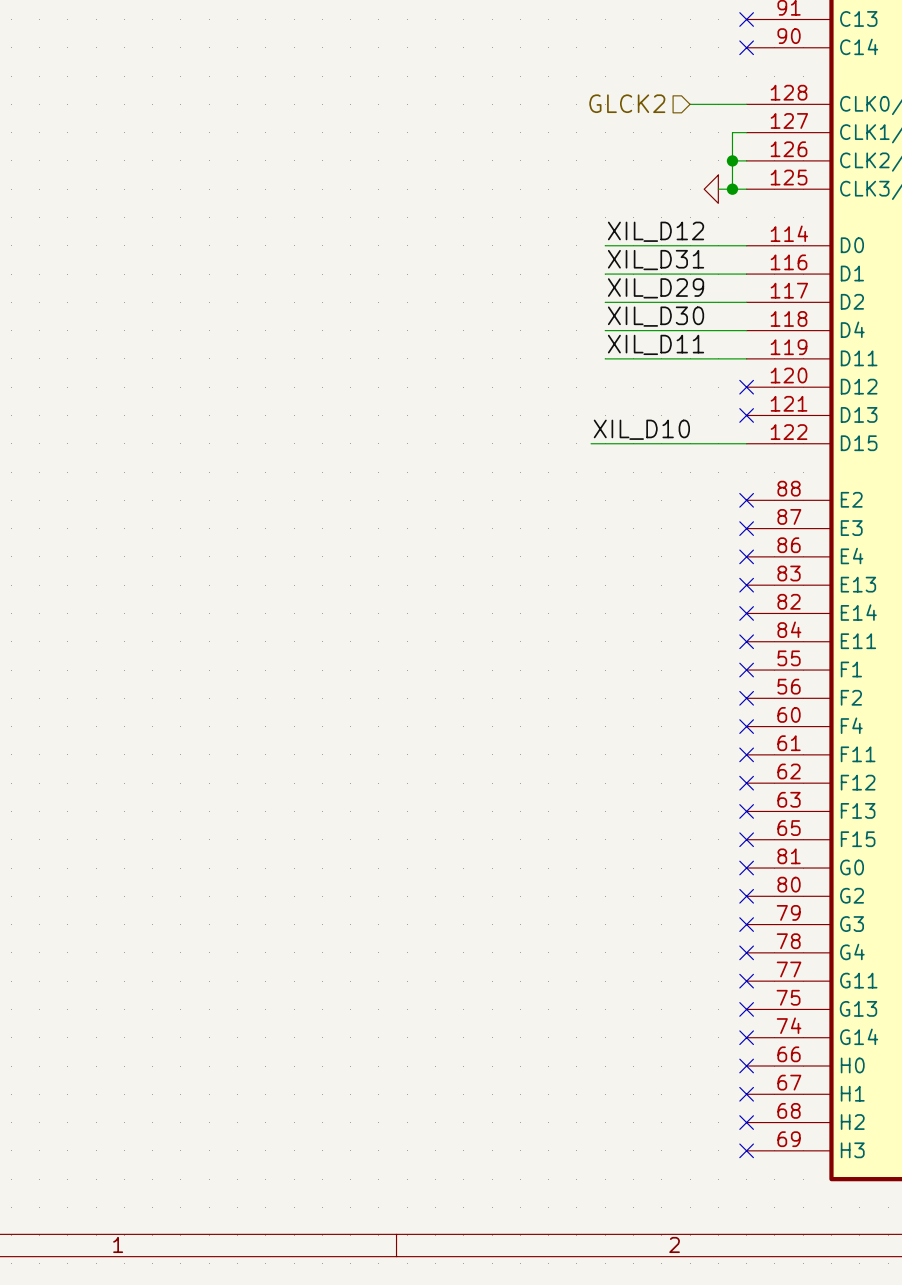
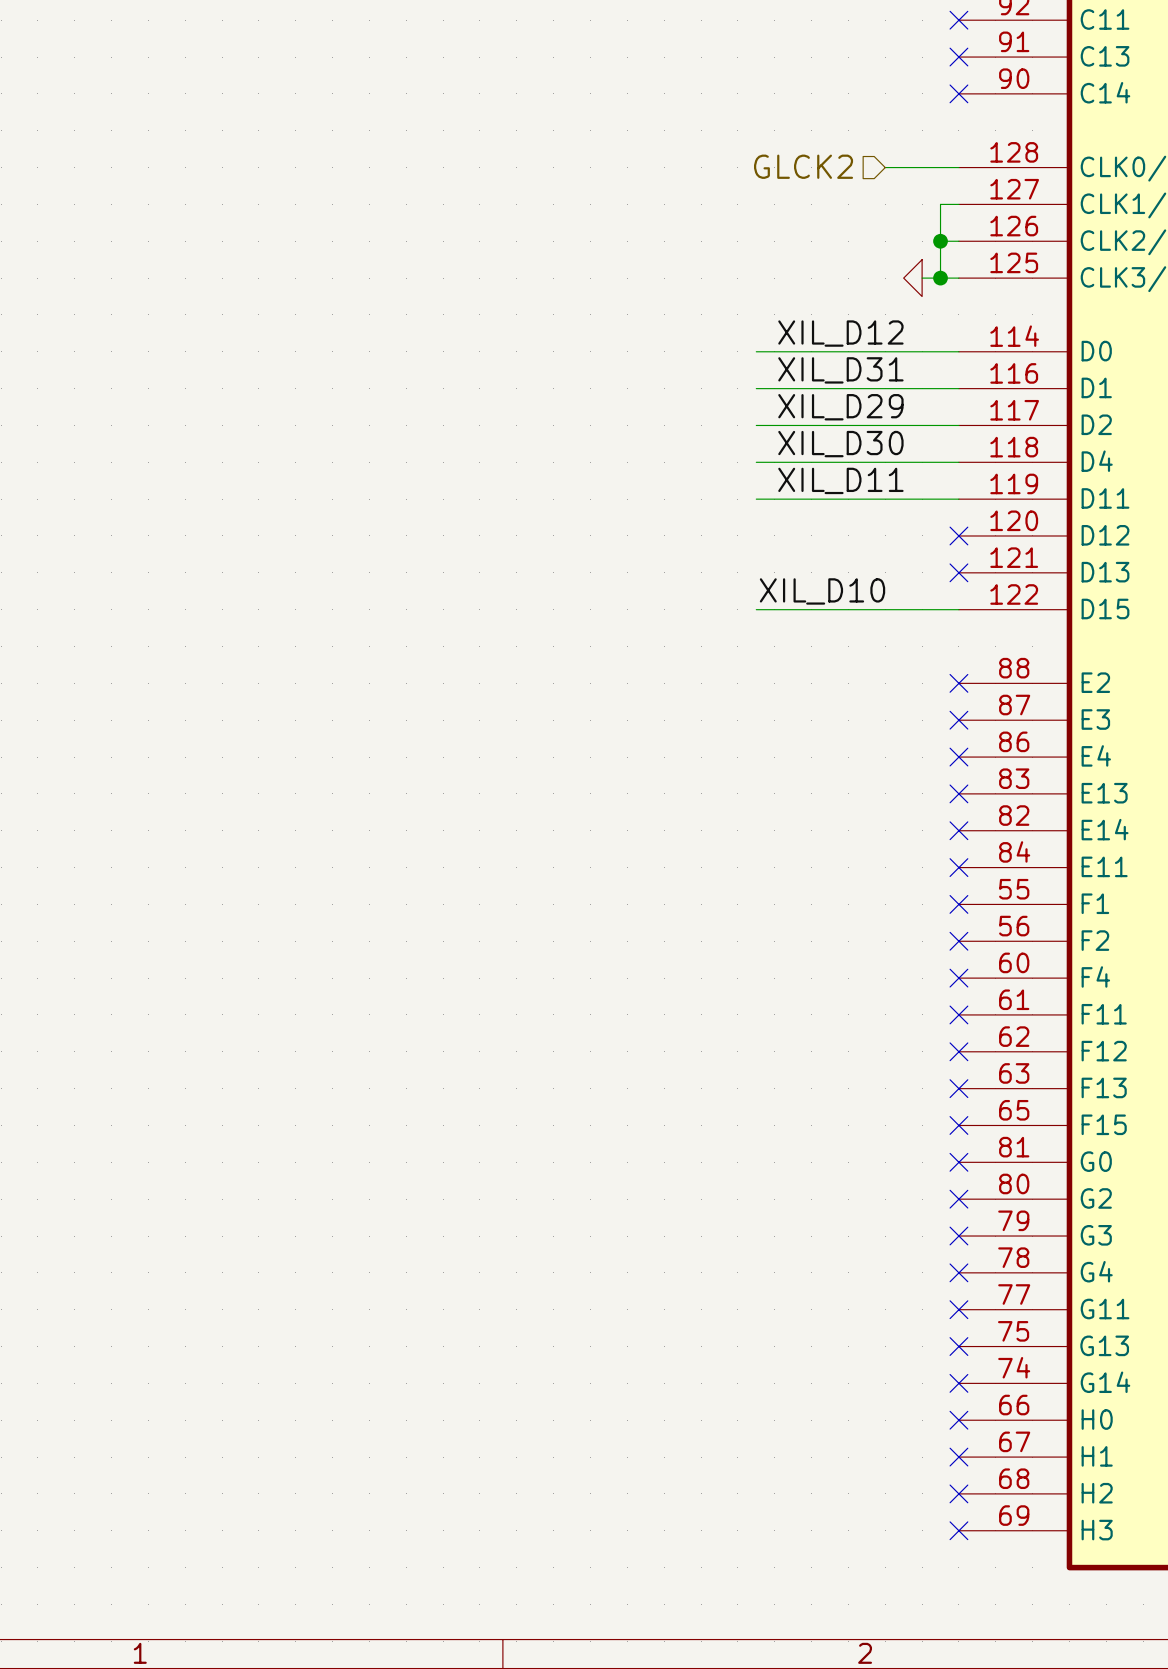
wire: none -> (756, 351) (774, 351)
wire: none -> (756, 388) (774, 388)
wire: none -> (756, 425) (774, 425)
wire: none -> (756, 462) (774, 462)
wire: none -> (756, 499) (774, 499)

